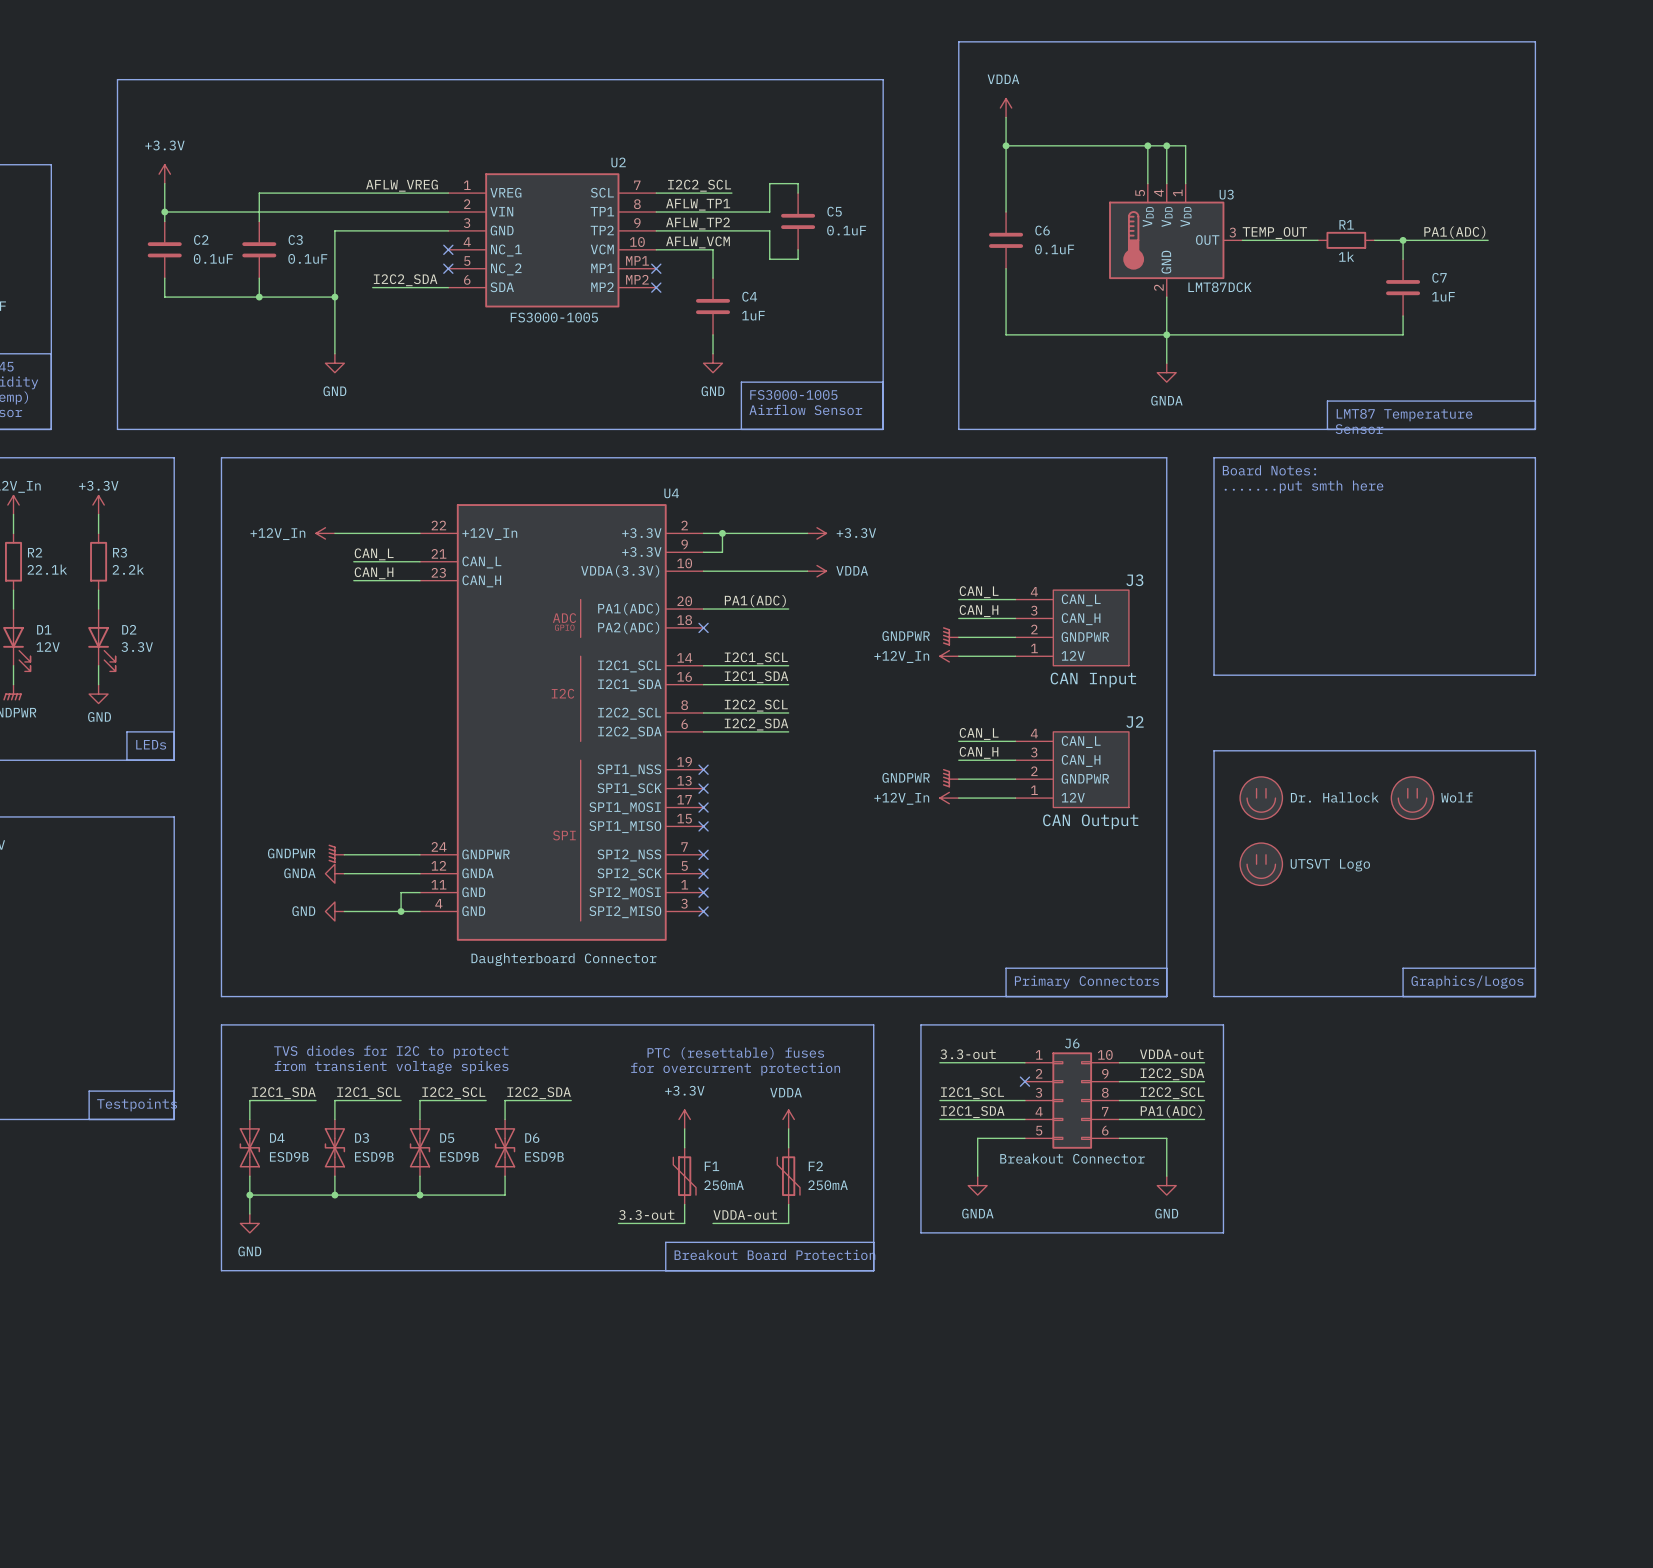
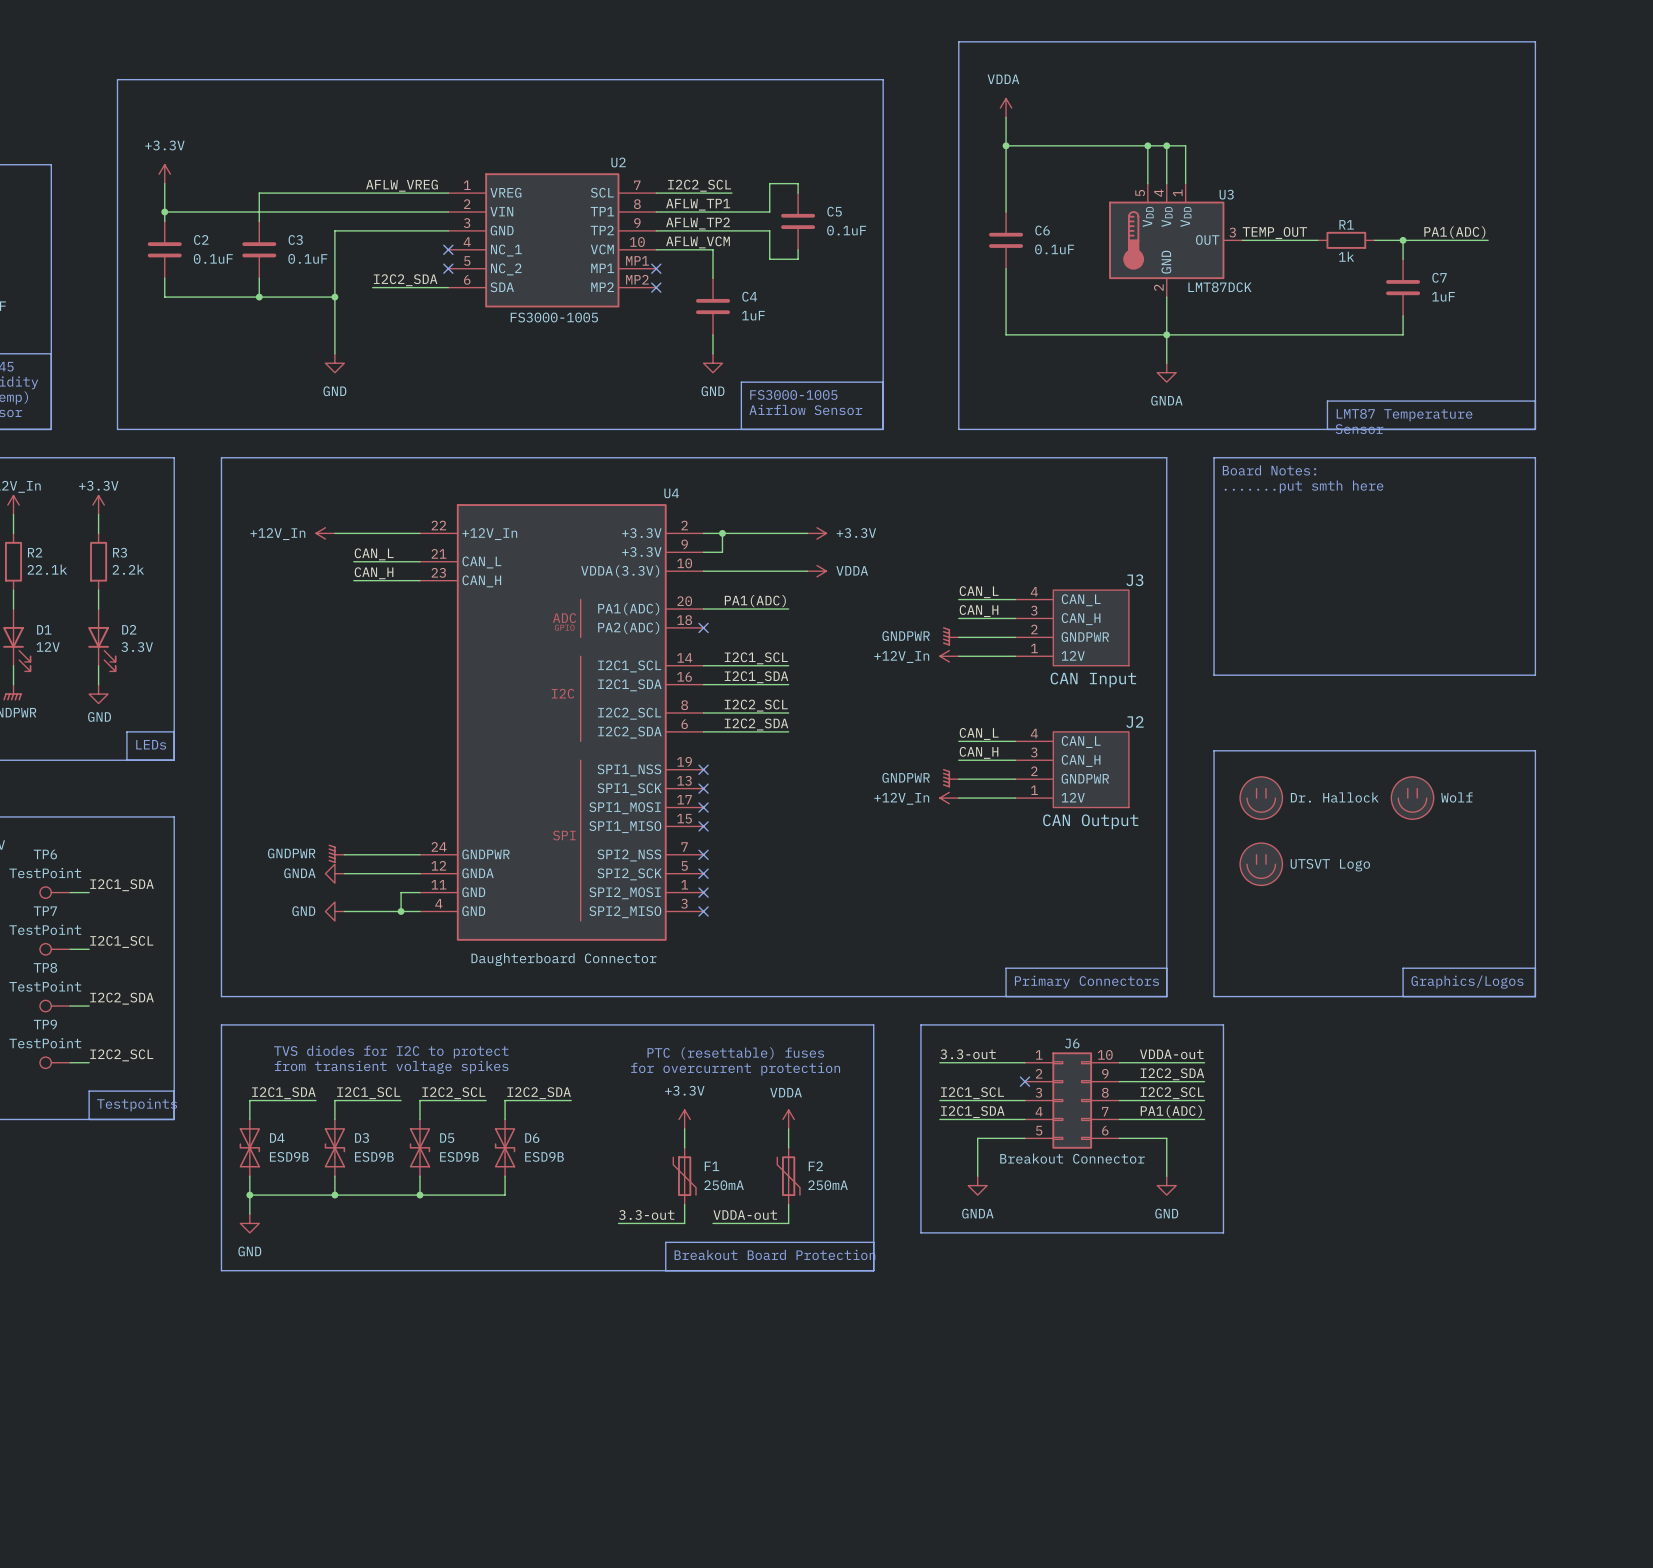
label: none -> I2C1_SDA (122, 885)
TP6: none -> TestPoint (55, 892)
wire: none -> (70, 892) (89, 892)
label: none -> I2C1_SCL (121, 941)
TP7: none -> TestPoint (55, 949)
wire: none -> (70, 949) (89, 949)
label: none -> I2C2_SDA (122, 998)
TP8: none -> TestPoint (55, 1006)
wire: none -> (70, 1006) (89, 1006)
label: none -> I2C2_SCL (121, 1055)
TP9: none -> TestPoint (55, 1062)
wire: none -> (70, 1062) (89, 1062)

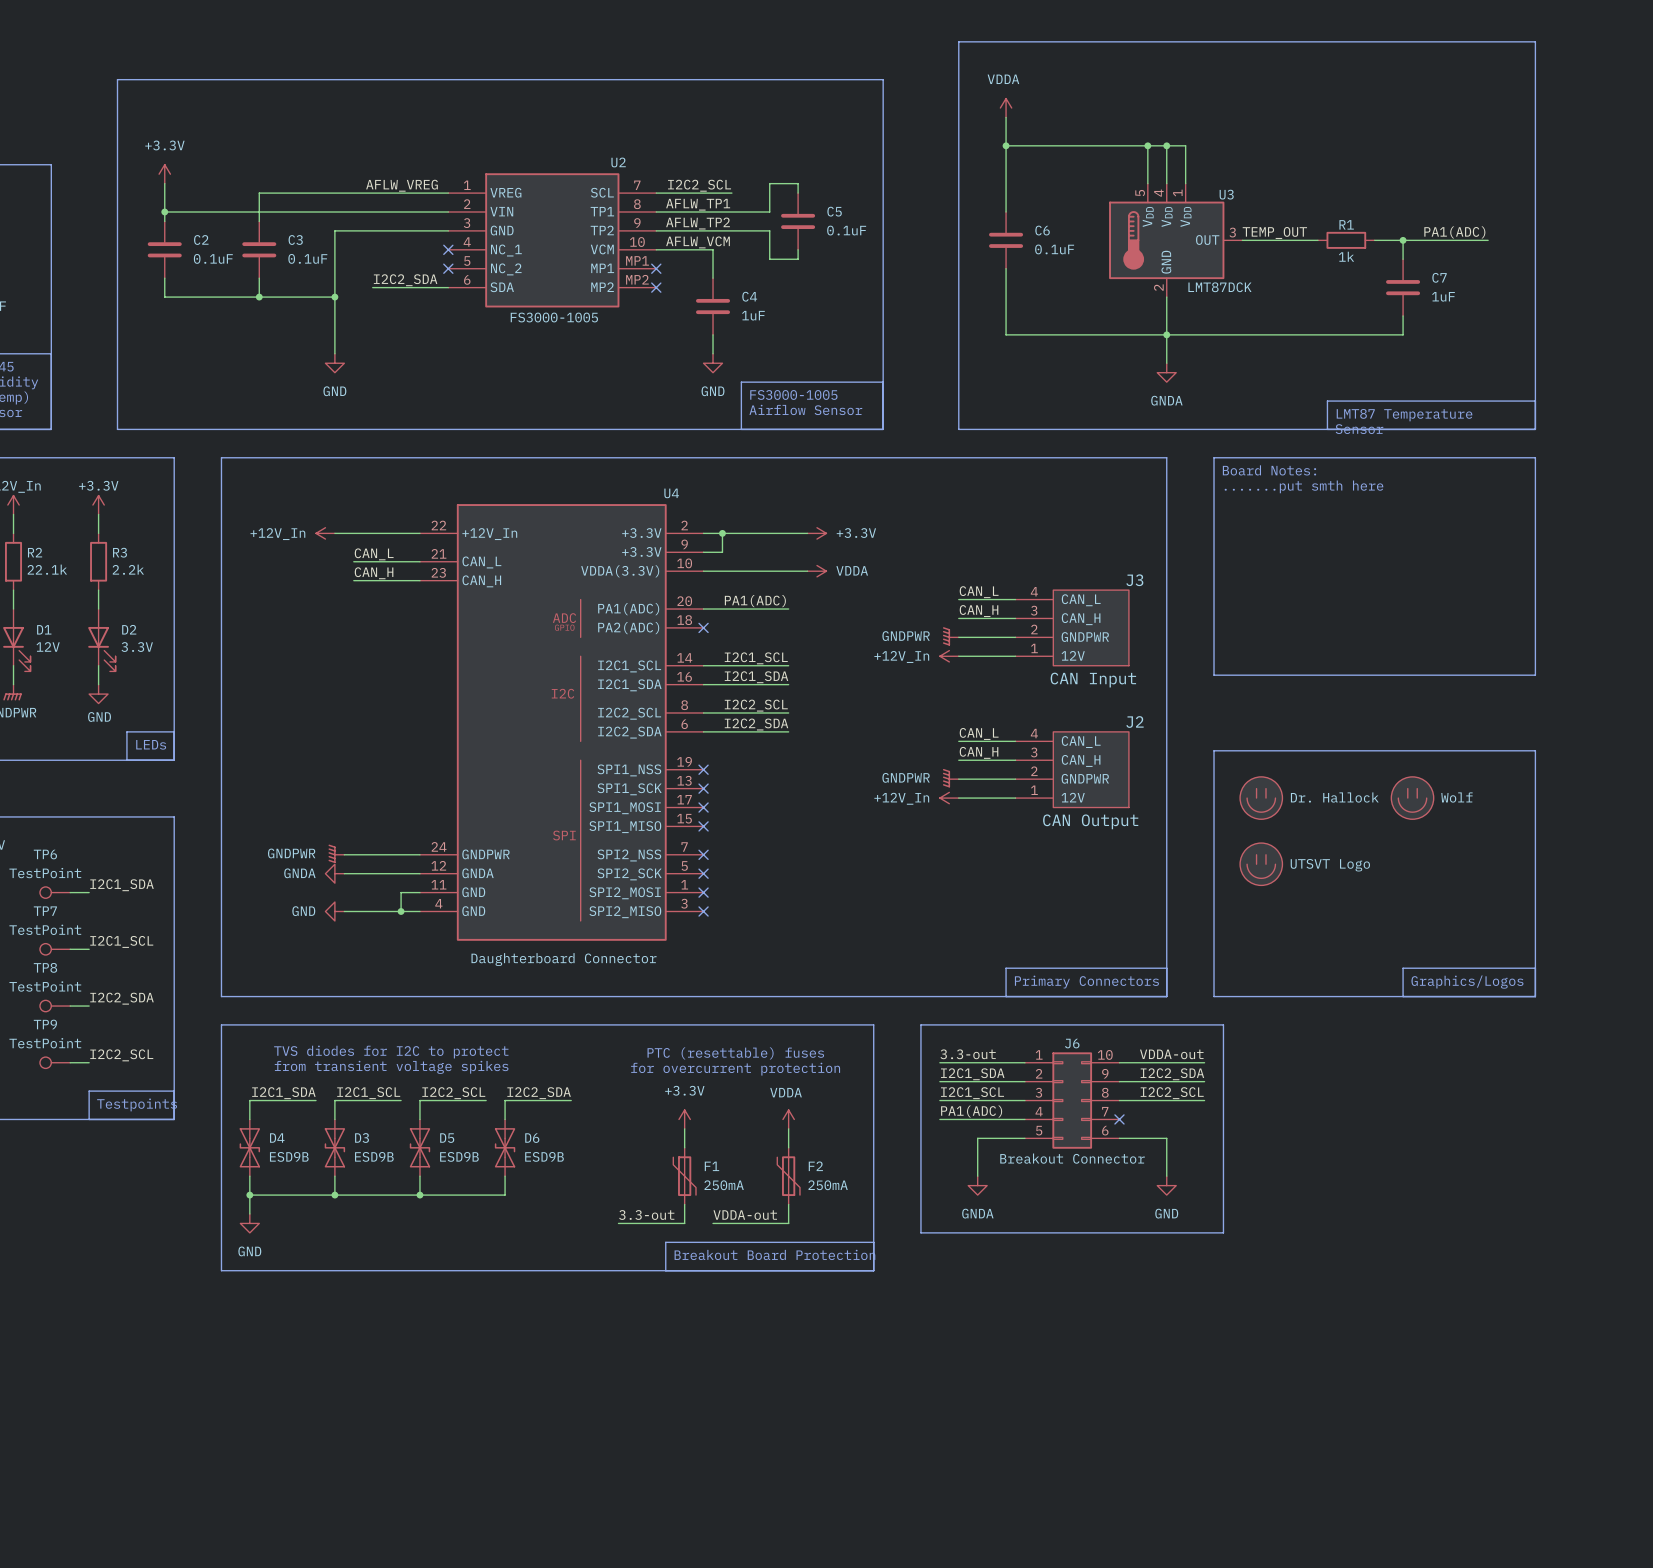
label: none -> I2C1_SDA (972, 1074)
no-connect mark: (1024, 1081) -> none
label: PA1(ADC) (1171, 1111) -> none
label: I2C1_SDA (972, 1112) -> PA1(ADC) (971, 1111)
wire: (1119, 1119) (1204, 1119) -> (939, 1081) (1024, 1081)
no-connect mark: none -> (1119, 1119)

